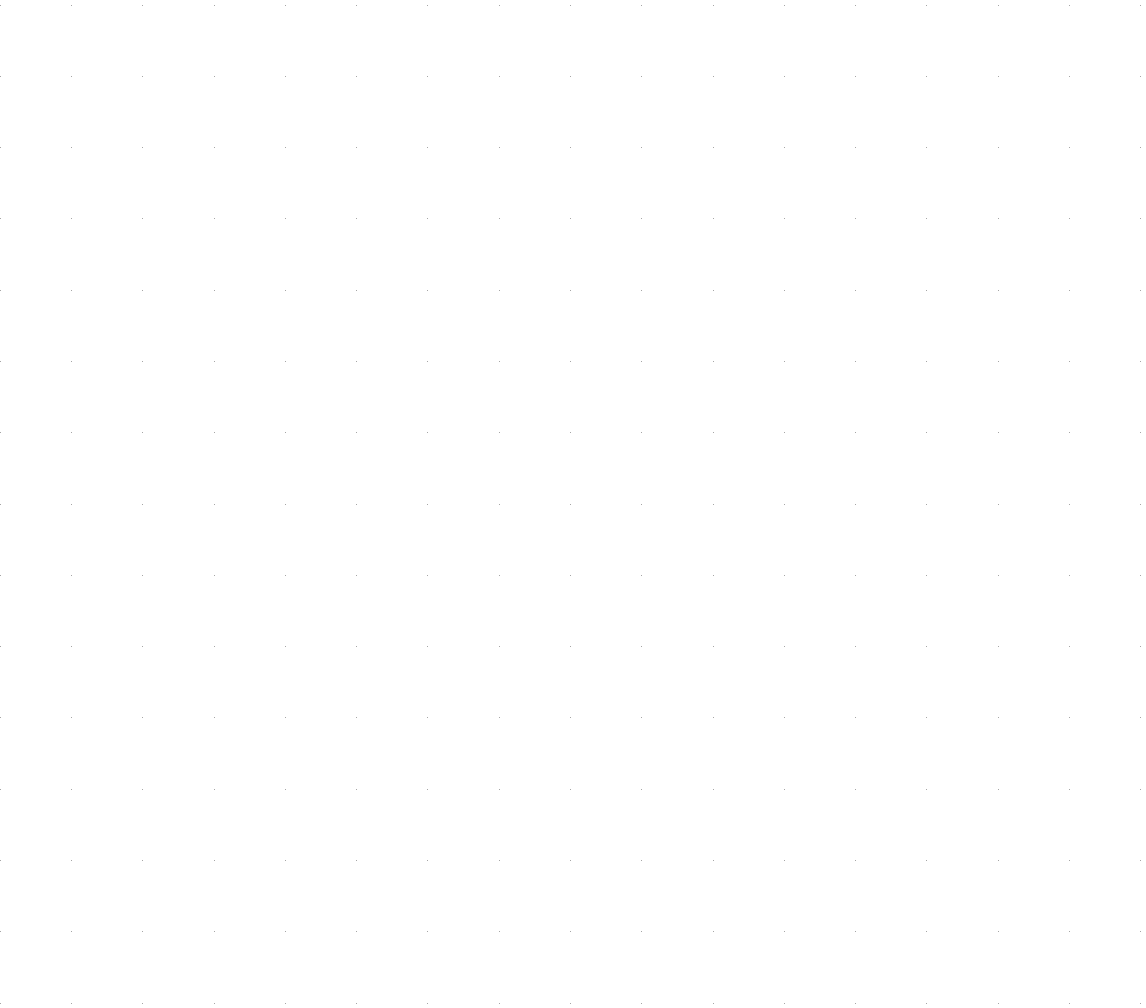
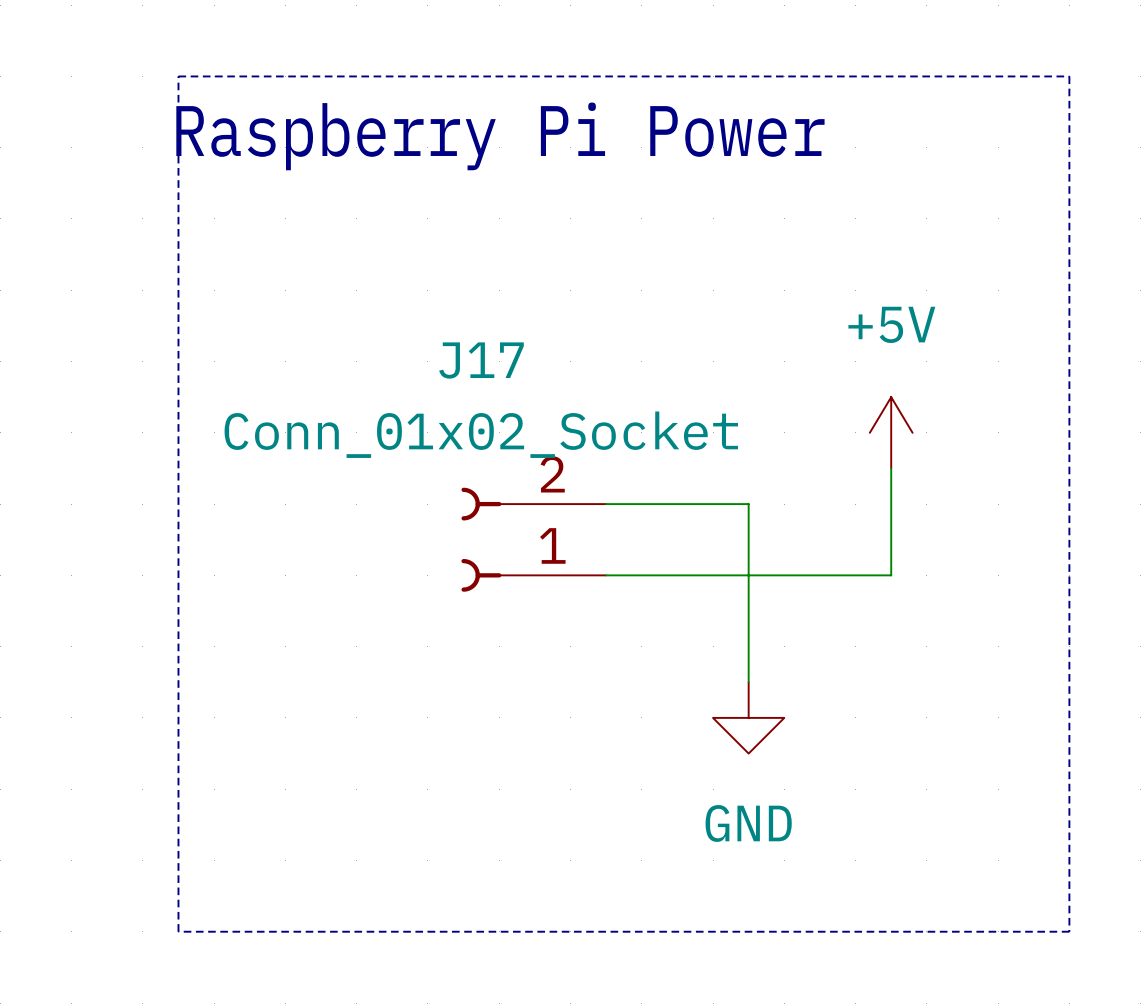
line: none -> (178, 76) (1069, 76) (1069, 931) (178, 931) (178, 76)
text: none -> Raspberry Pi Power (500, 136)
power symbol: none -> +5V (891, 432)
wire: none -> (891, 468) (891, 575) (606, 575)
wire: none -> (606, 504) (748, 504) (748, 682)
J17: none -> Conn_01x02_Socket (533, 539)
power symbol: none -> GND (748, 717)

